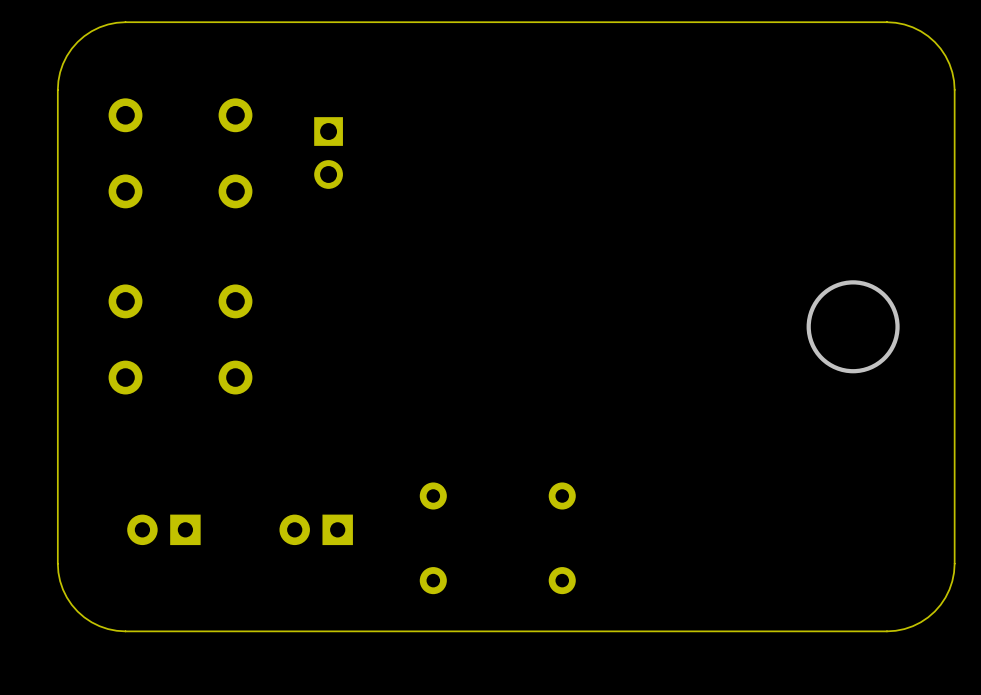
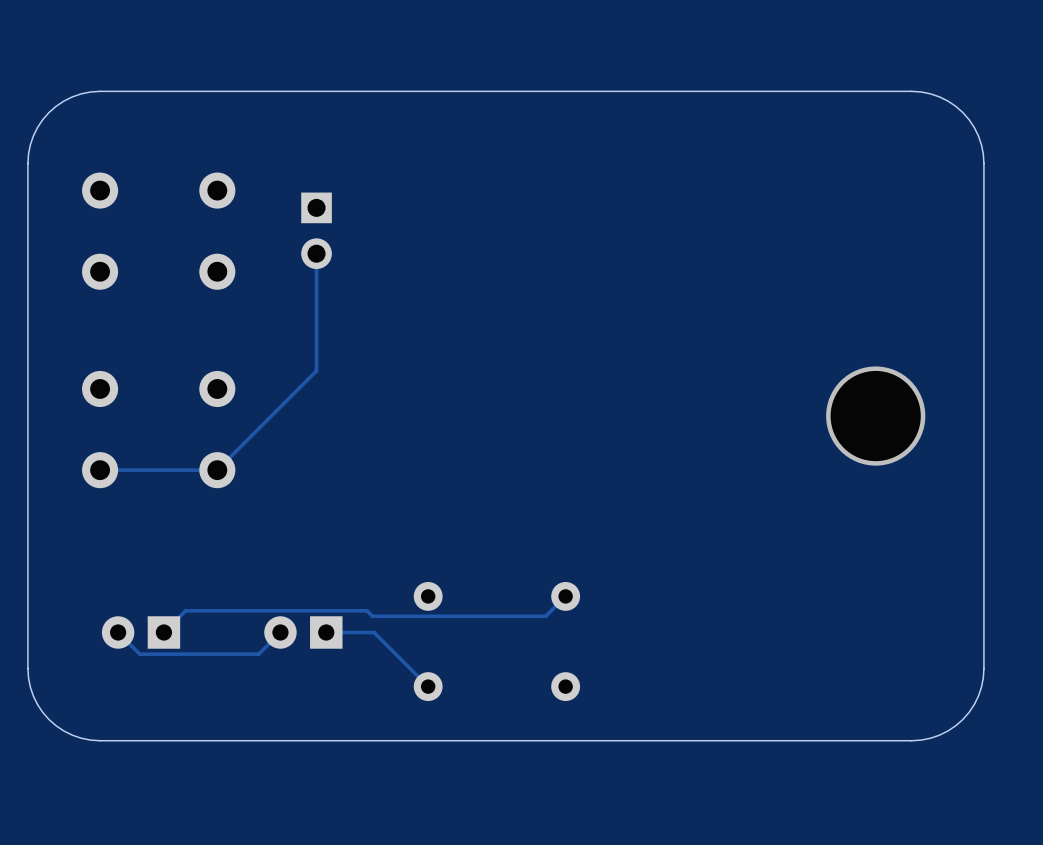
track: none -> (316, 253) (316, 370) (217, 470) (100, 470)
track: none -> (565, 596) (545, 616) (372, 616) (367, 610) (185, 610) (163, 632)
track: none -> (280, 632) (258, 654) (139, 654) (118, 632)
track: none -> (326, 632) (374, 632) (428, 686)

